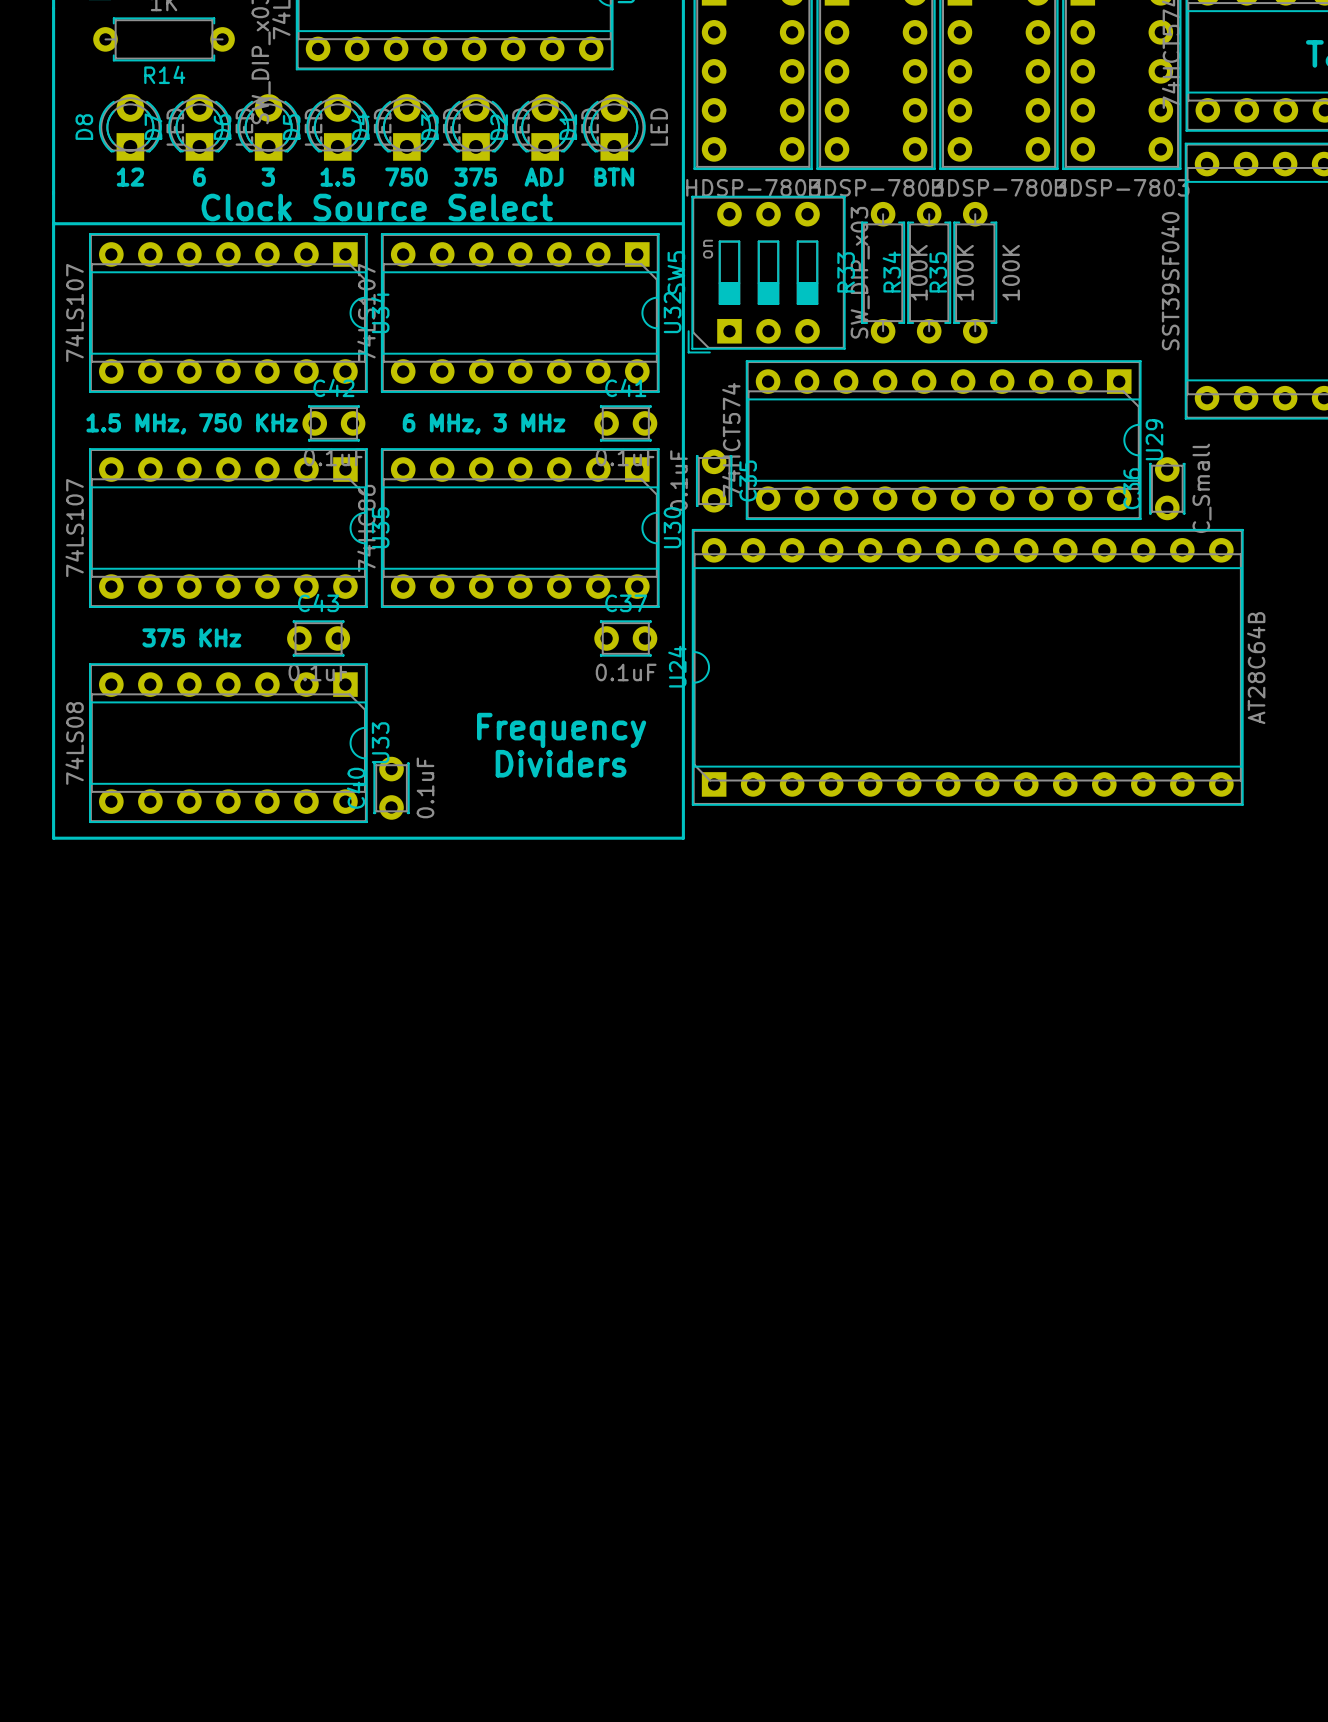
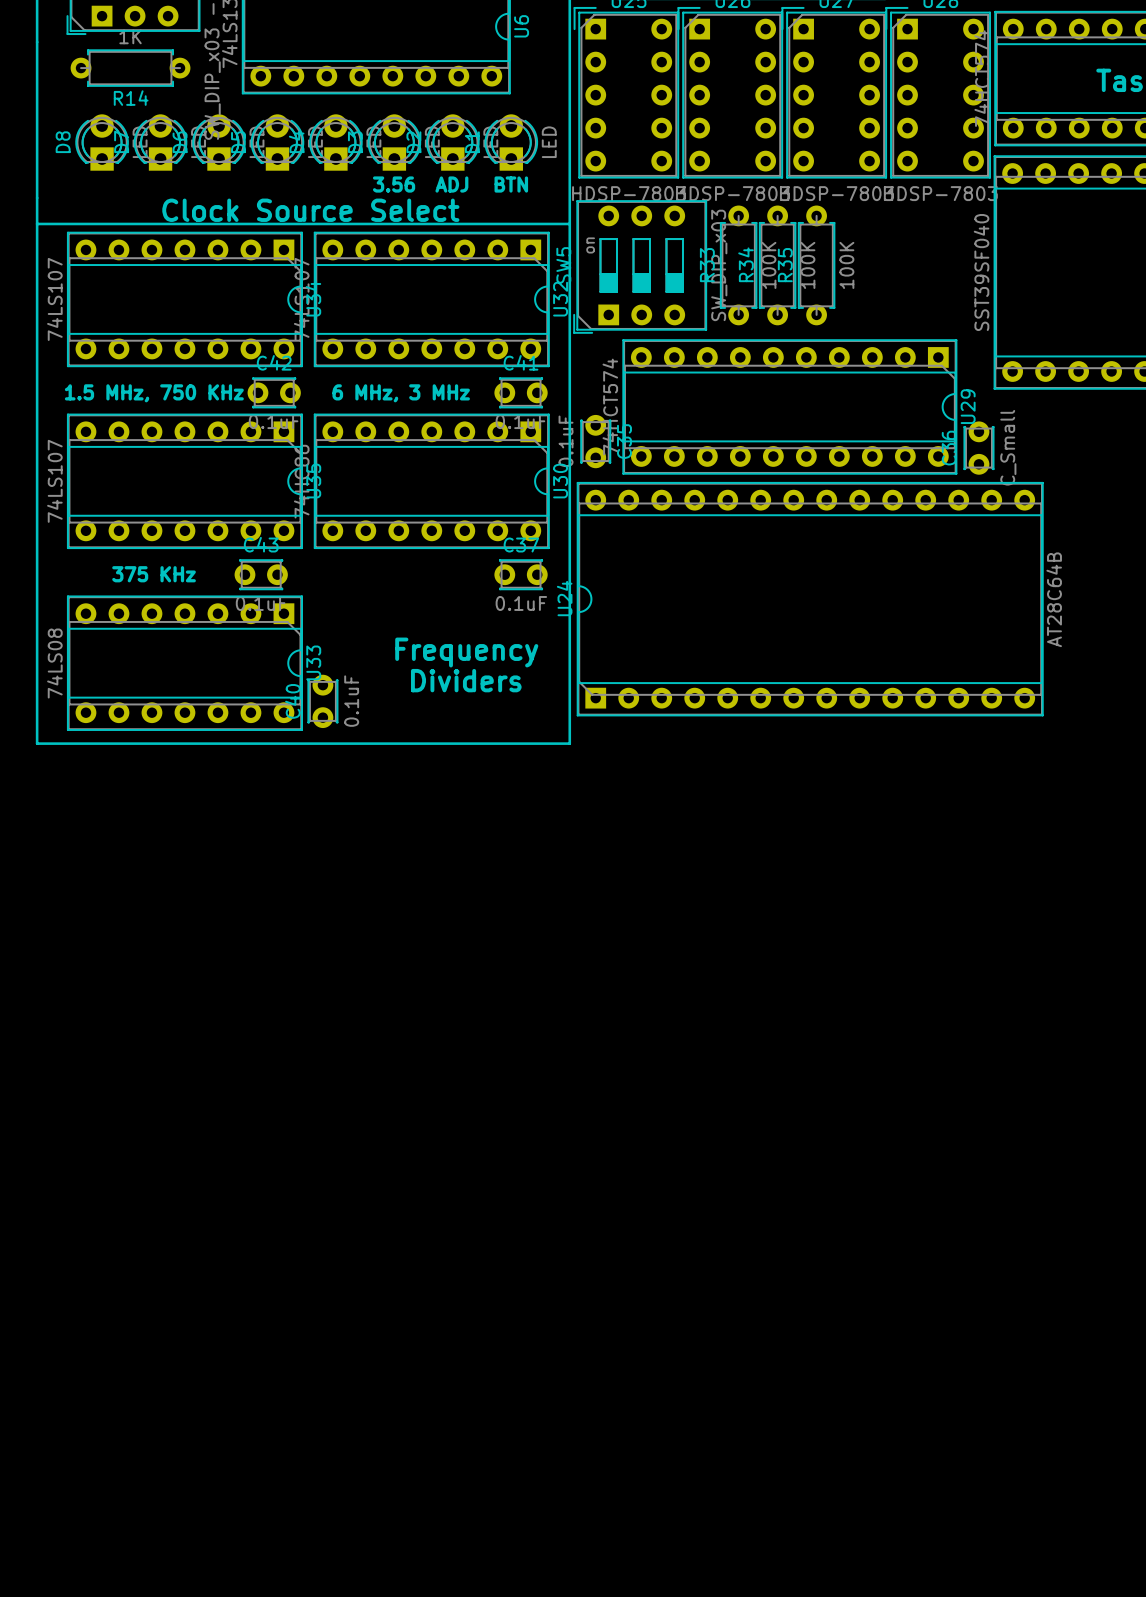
text: 12 (130, 177) -> none
text: 6 (199, 177) -> none
text: 3 (268, 177) -> none
text: 1.5 (337, 177) -> none
text: 750 (406, 177) -> none
text: 375 (475, 177) -> 3.56 (394, 184)

